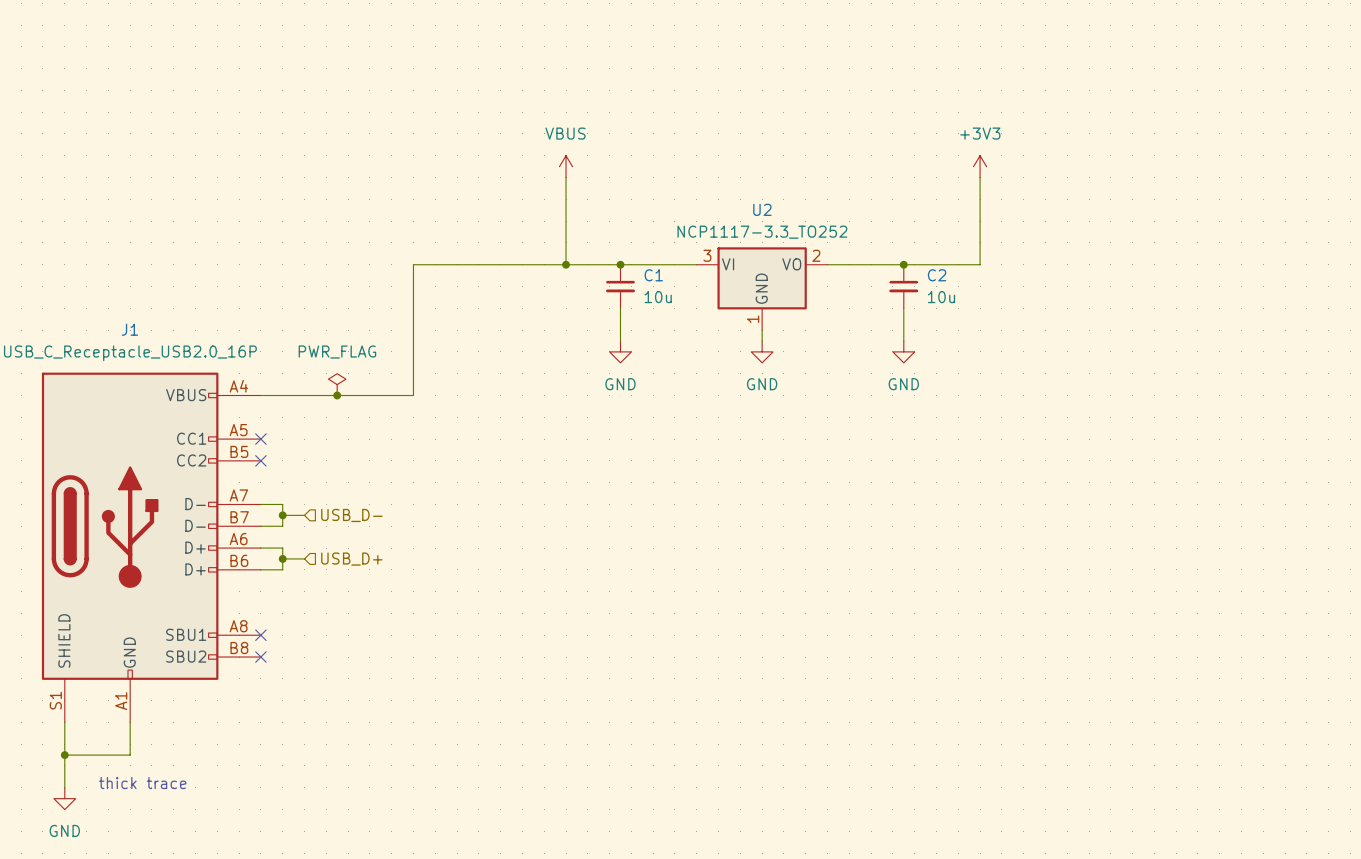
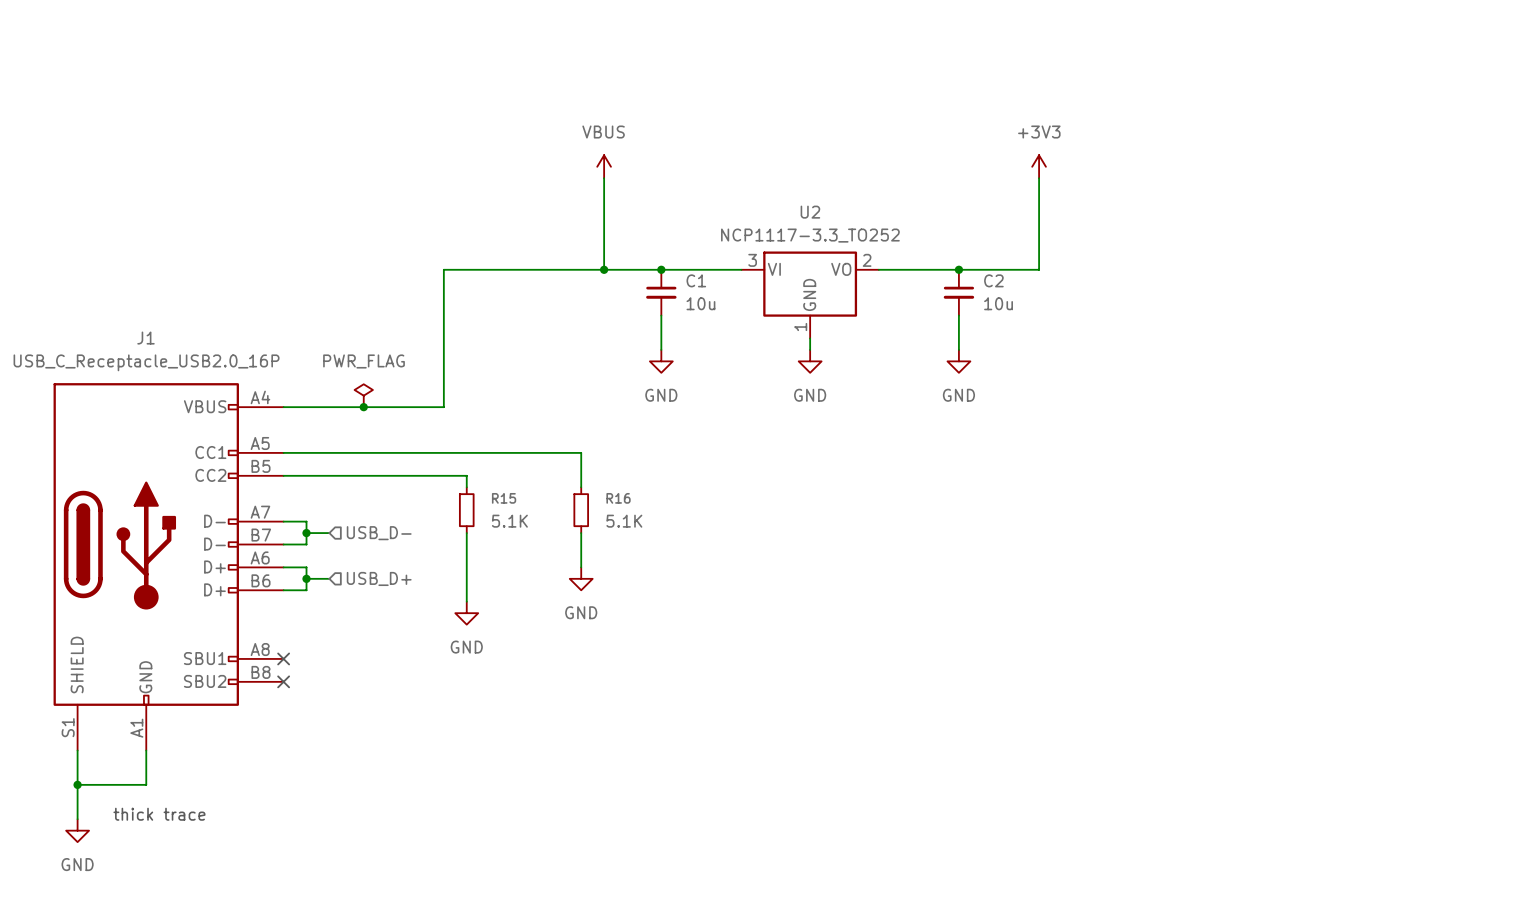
wire: none -> (283, 452) (581, 452) (581, 487)
no-connect mark: (260, 439) -> none
wire: none -> (283, 475) (466, 475) (466, 487)
no-connect mark: (260, 460) -> none
R15: none -> 5.1K (466, 510)
R16: none -> 5.1K (581, 510)
wire: none -> (466, 533) (466, 601)
wire: none -> (581, 533) (581, 567)
power symbol: none -> GND (581, 578)
power symbol: none -> GND (466, 613)

